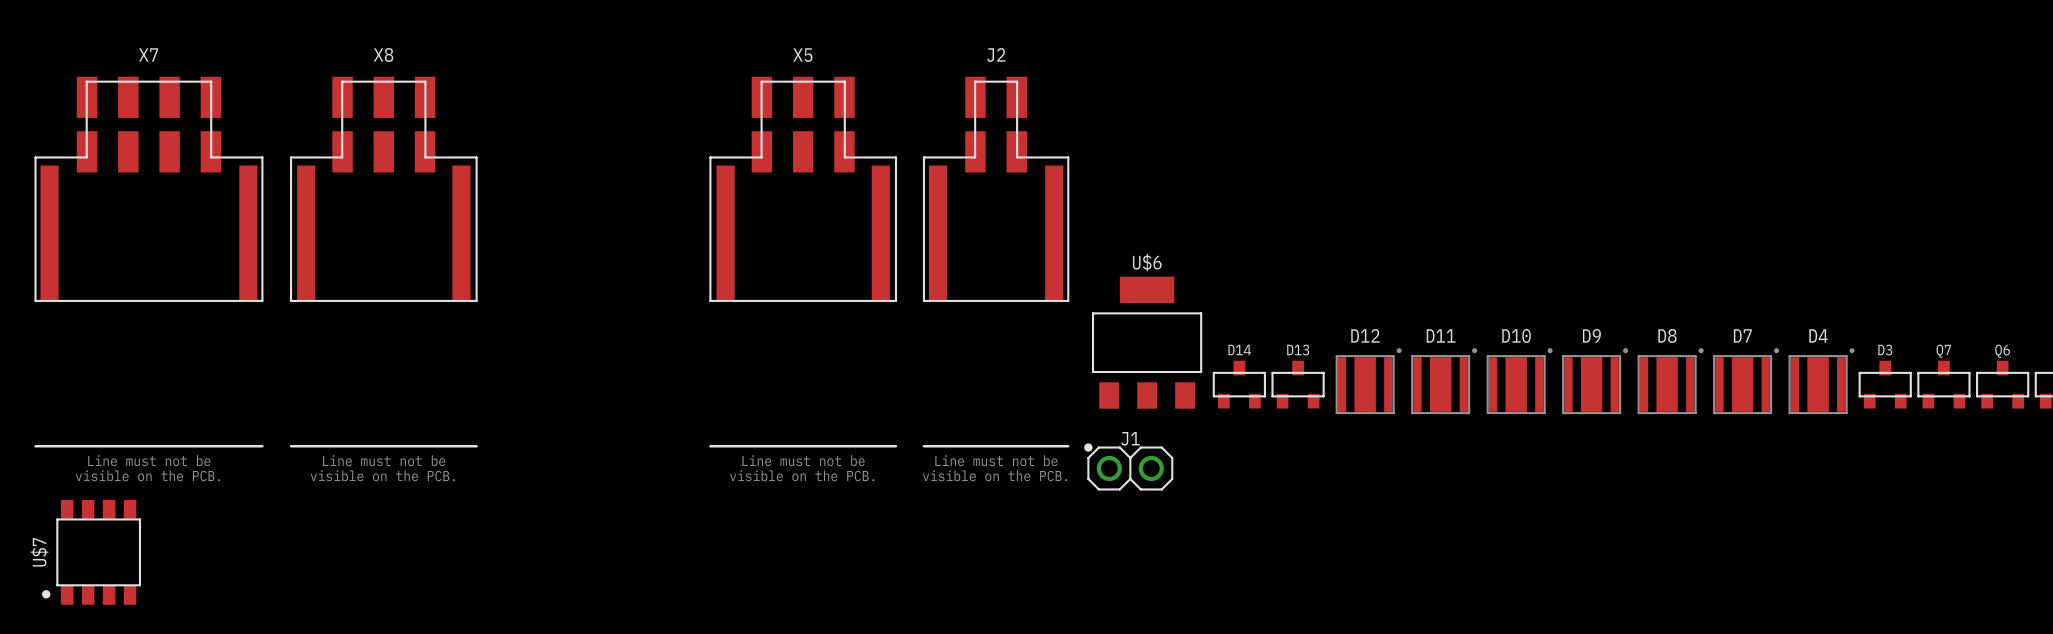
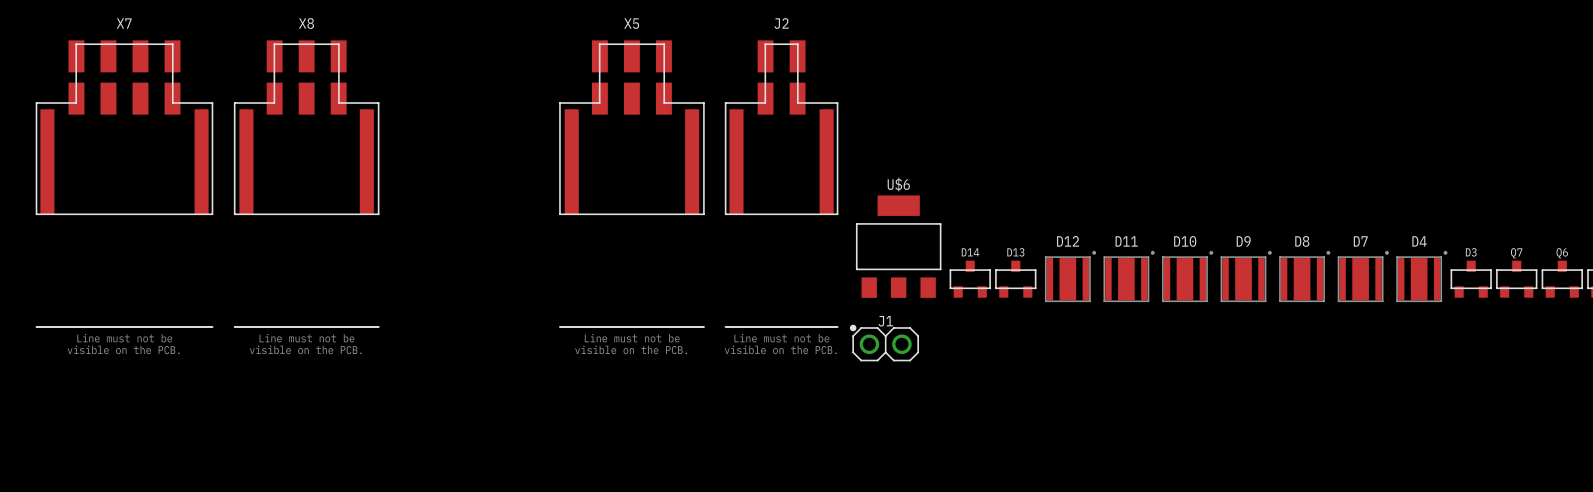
U$7: (91, 552) -> none

